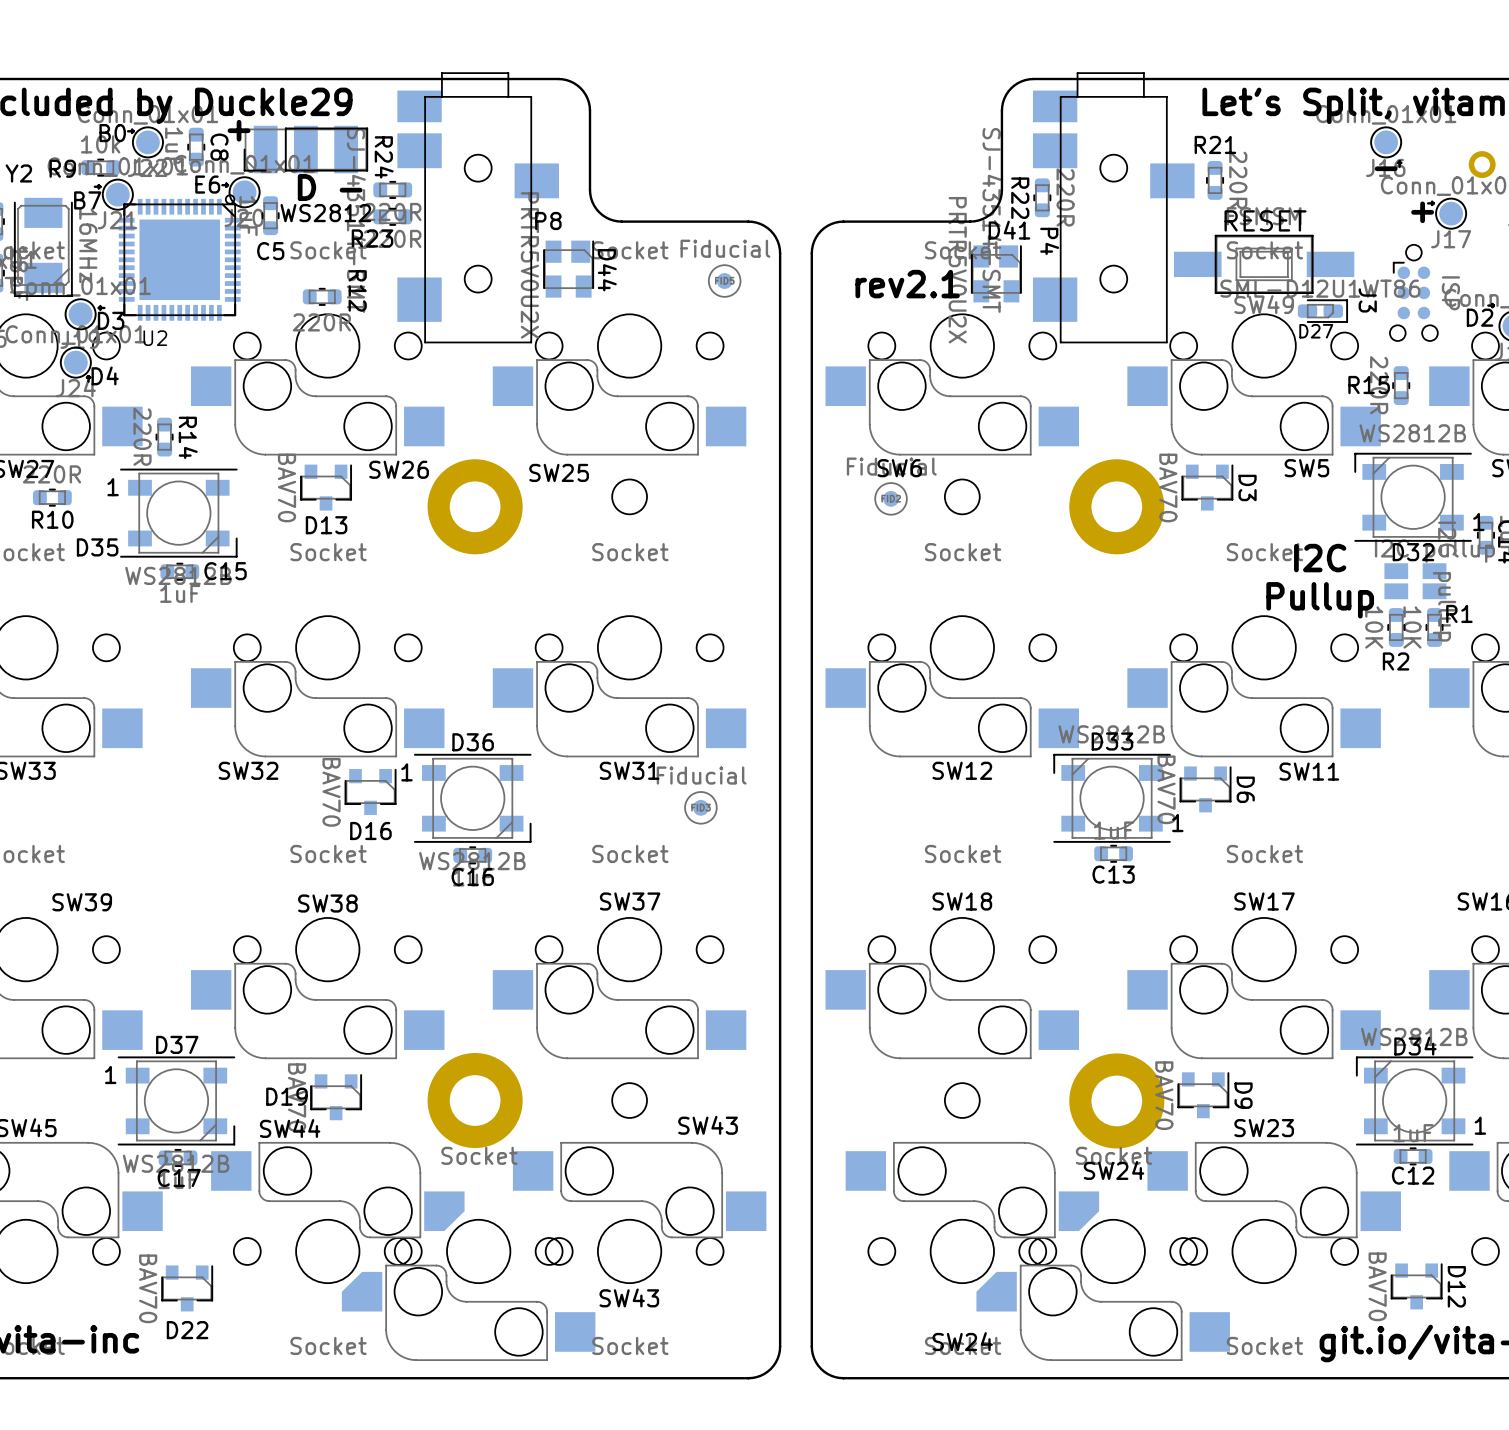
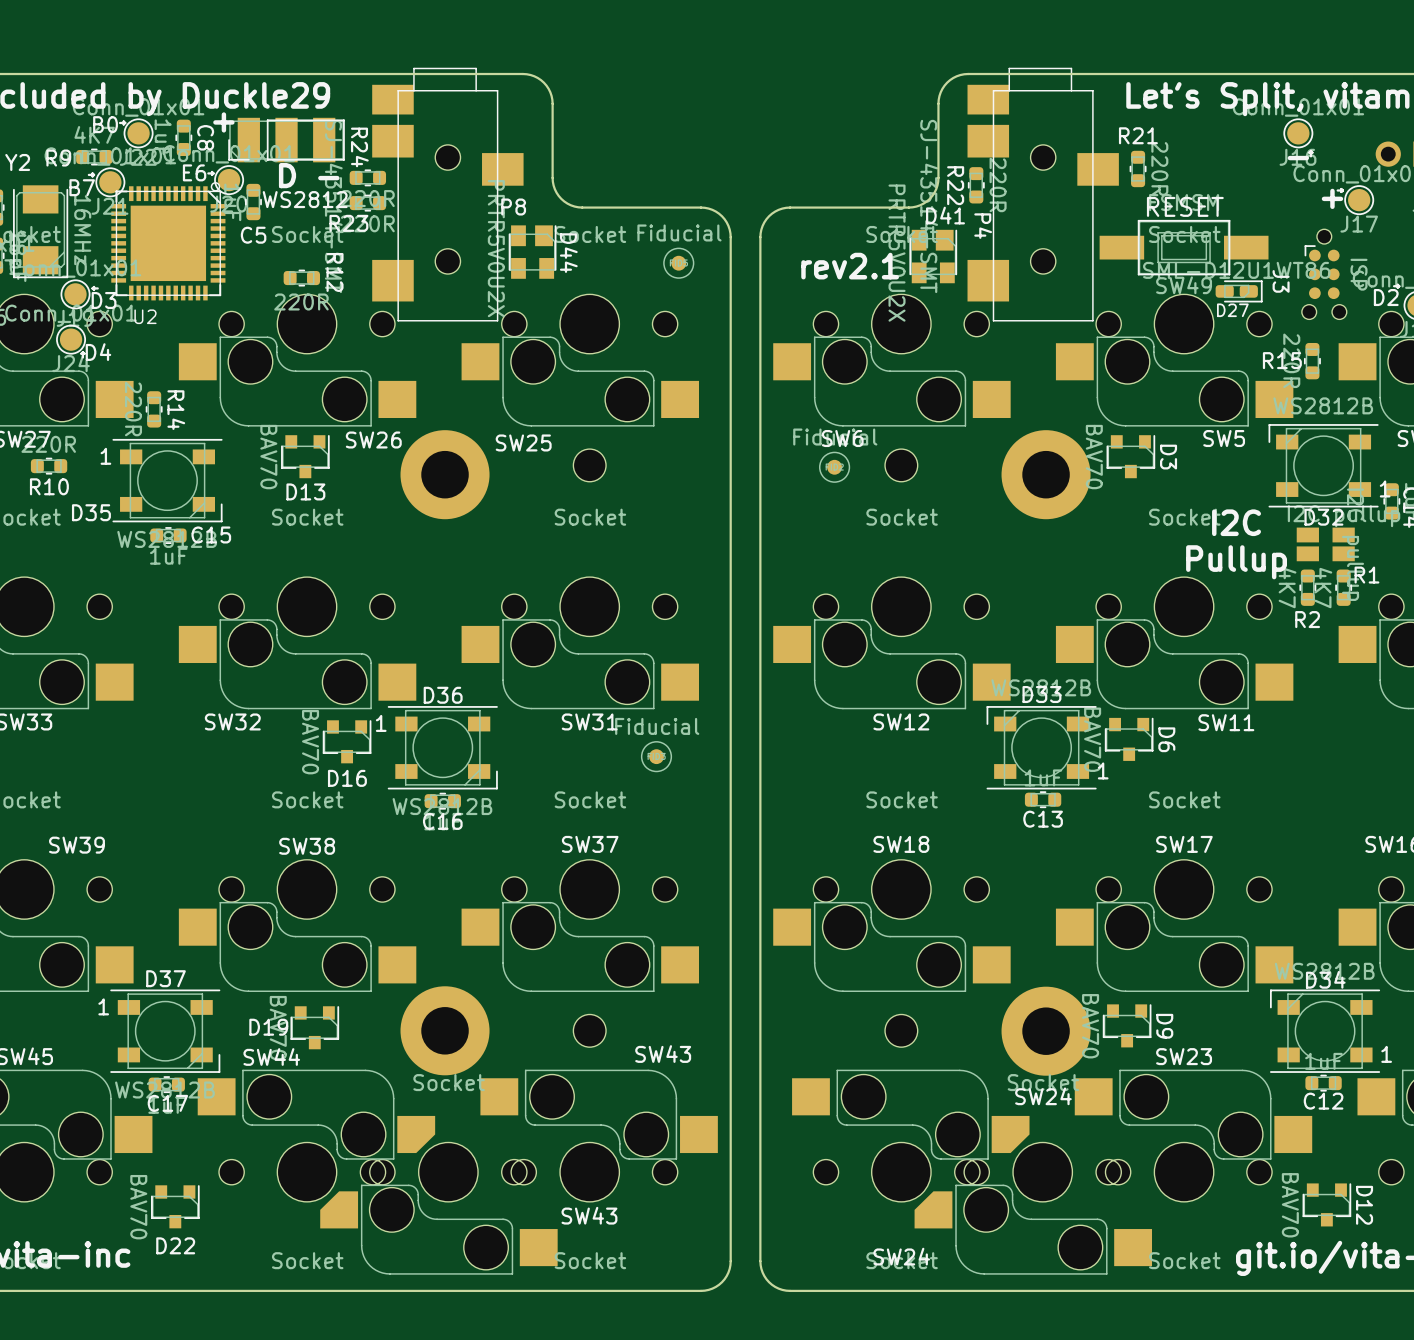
R9 value: 10k (100, 144) -> 4K7 (94, 134)
R2 value: 10K (1374, 627) -> 4K7 (1287, 588)
R1 value: 10K (1412, 627) -> 4K7 (1323, 588)

